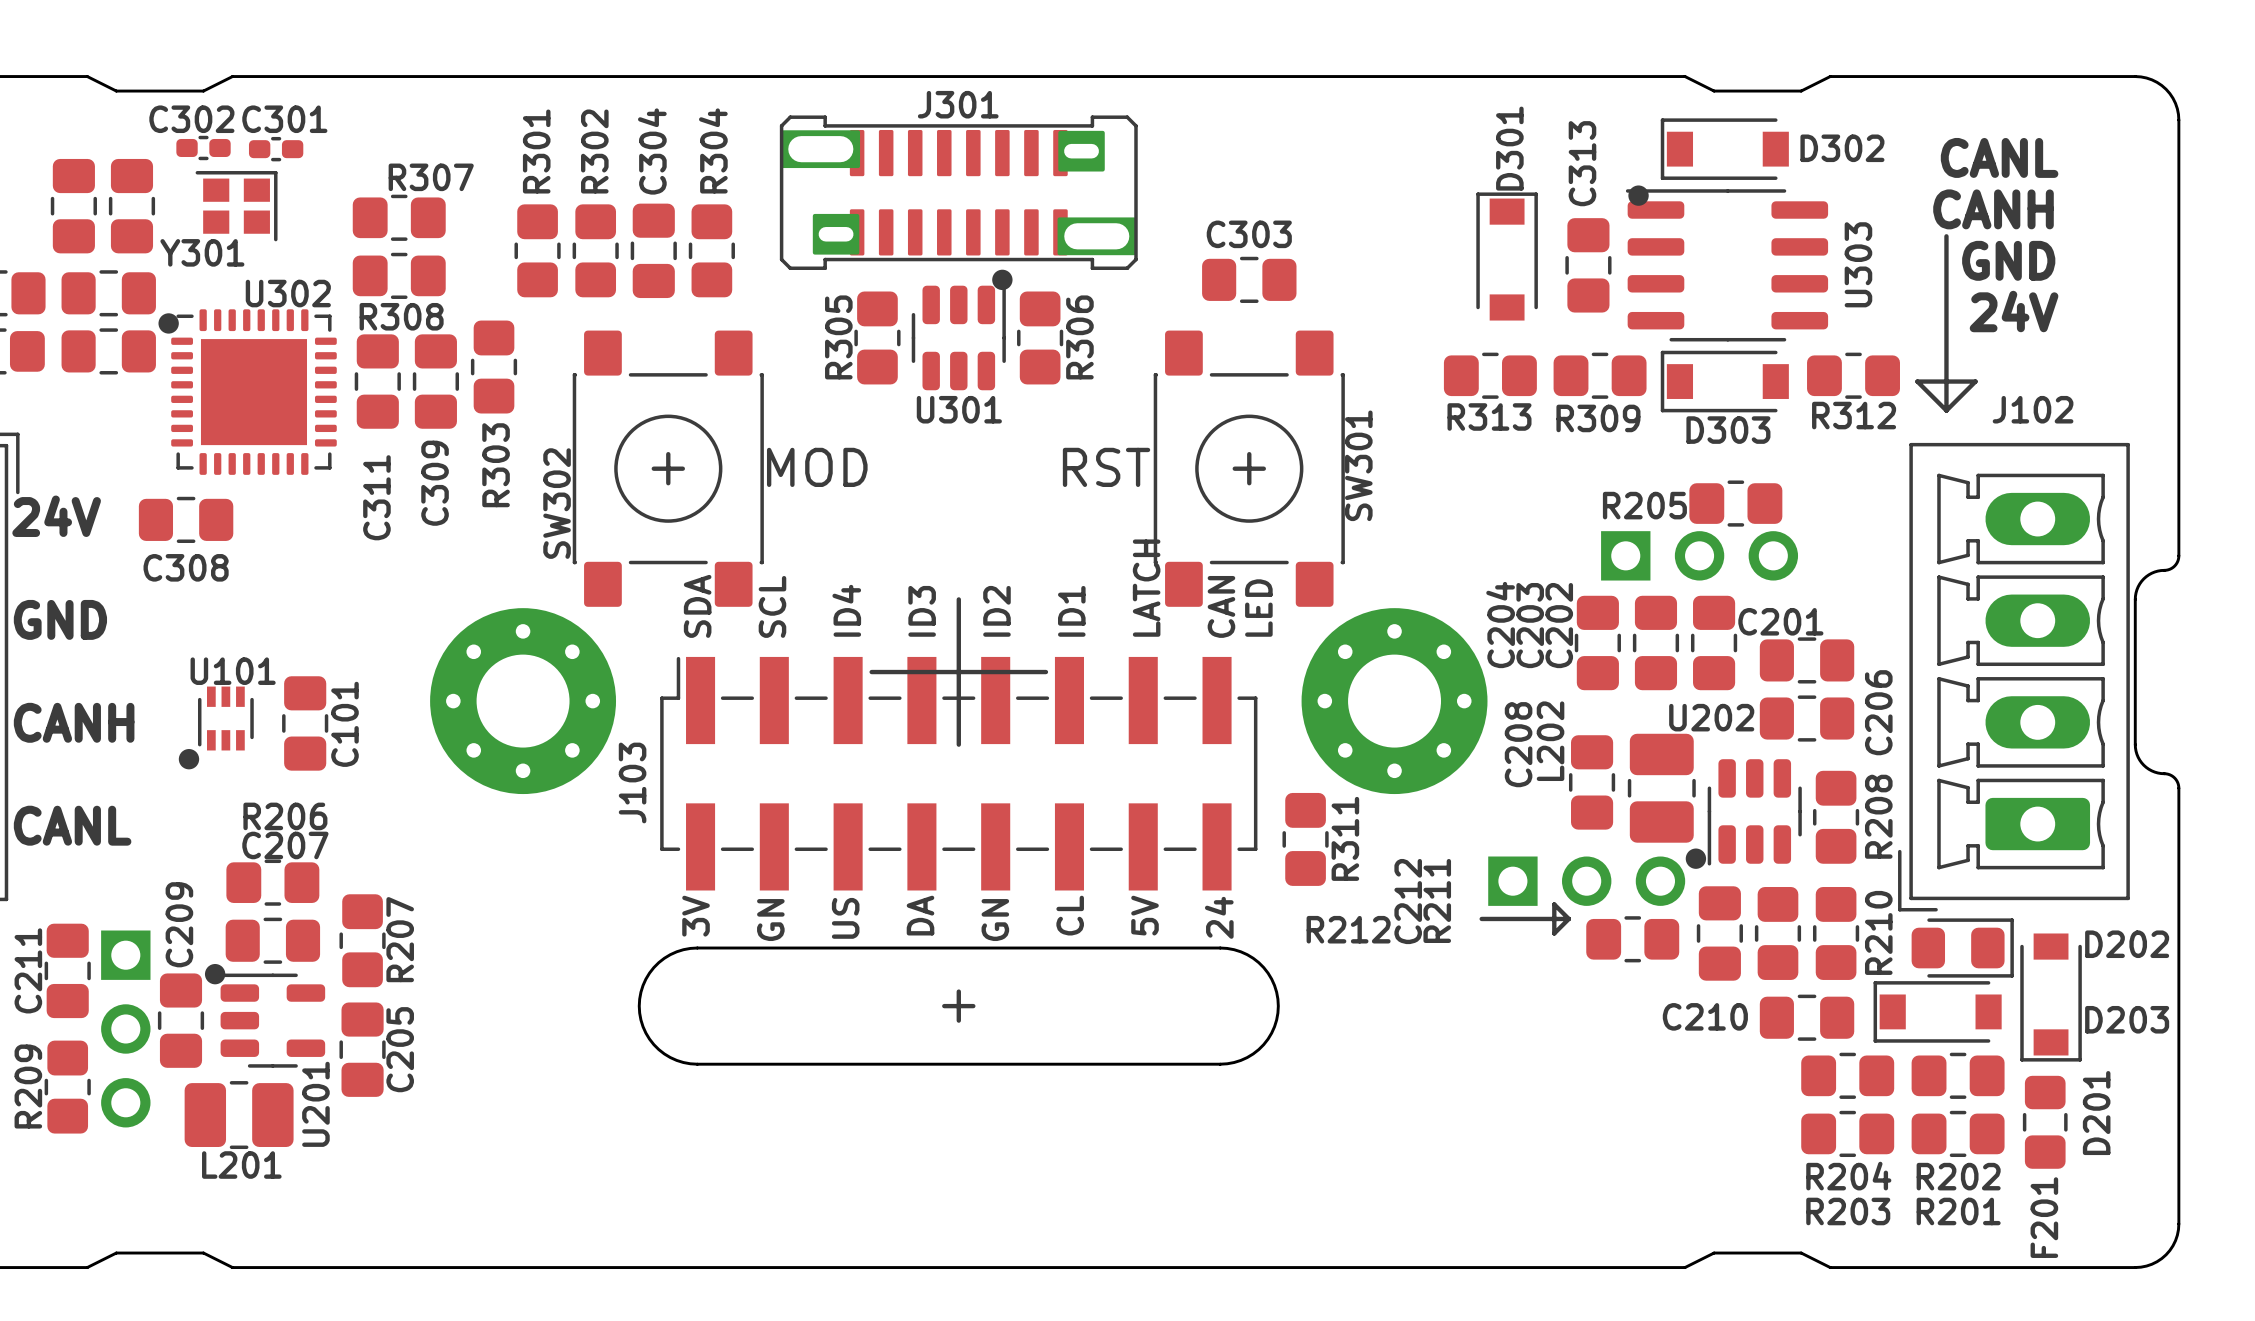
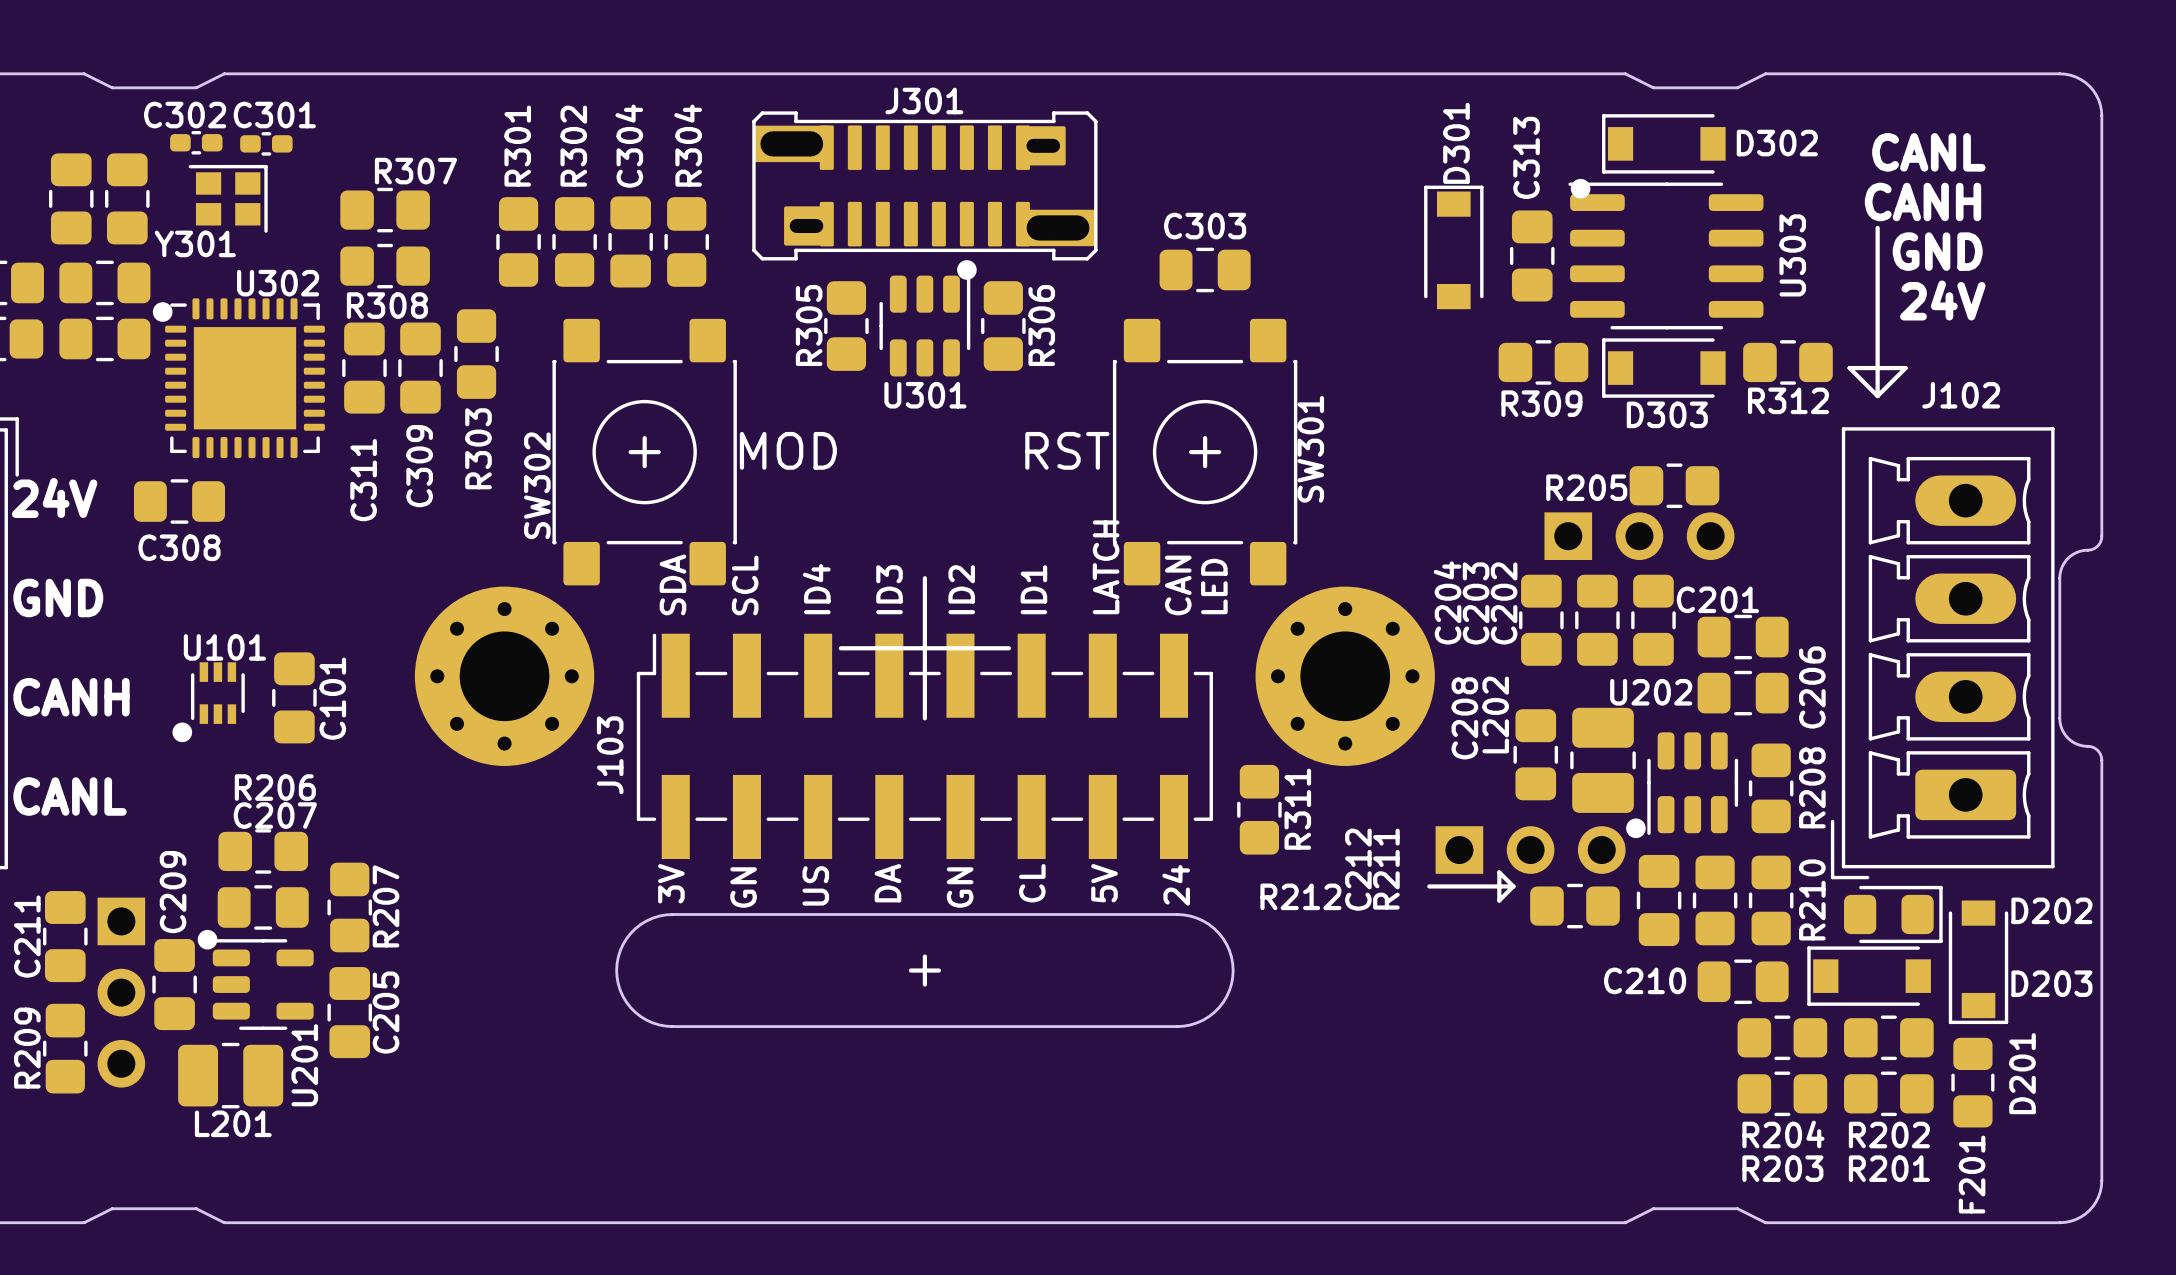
R313: (1490, 375) -> none

